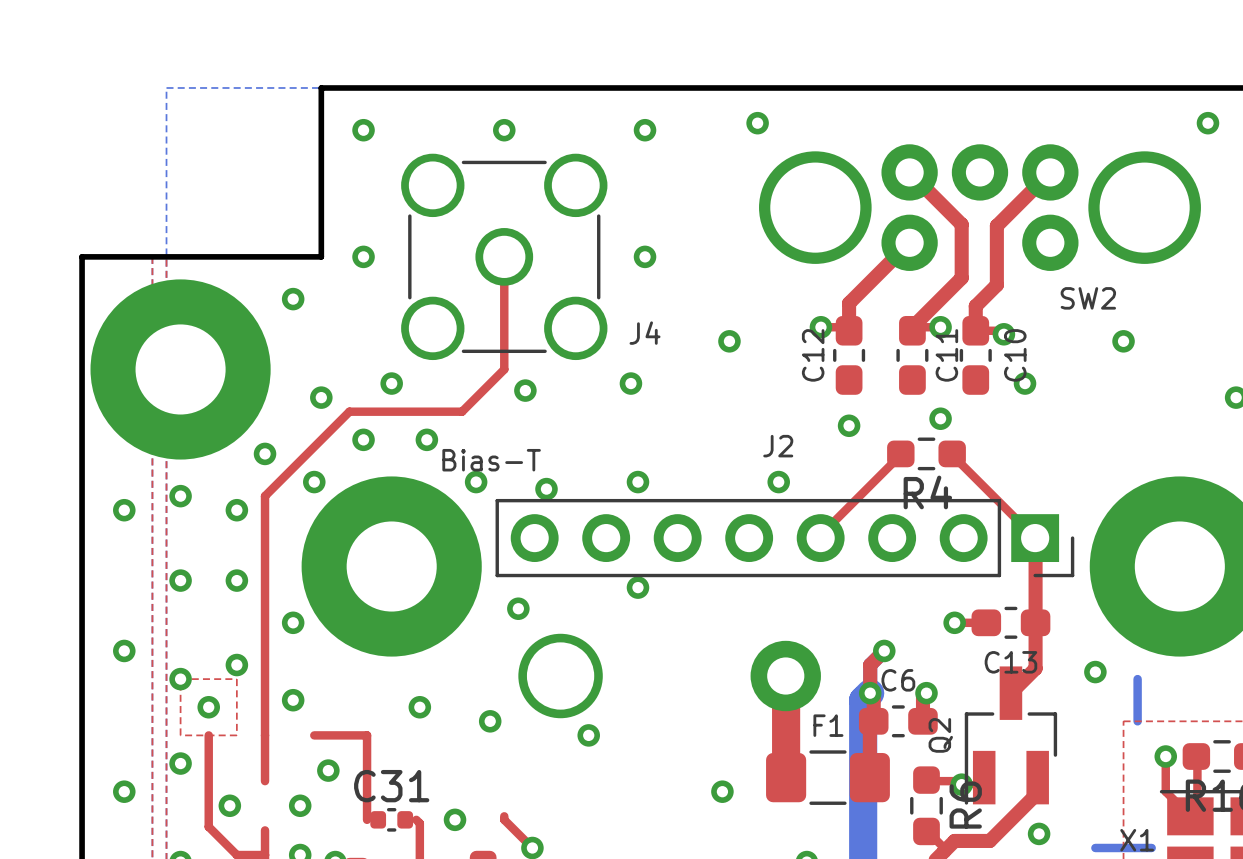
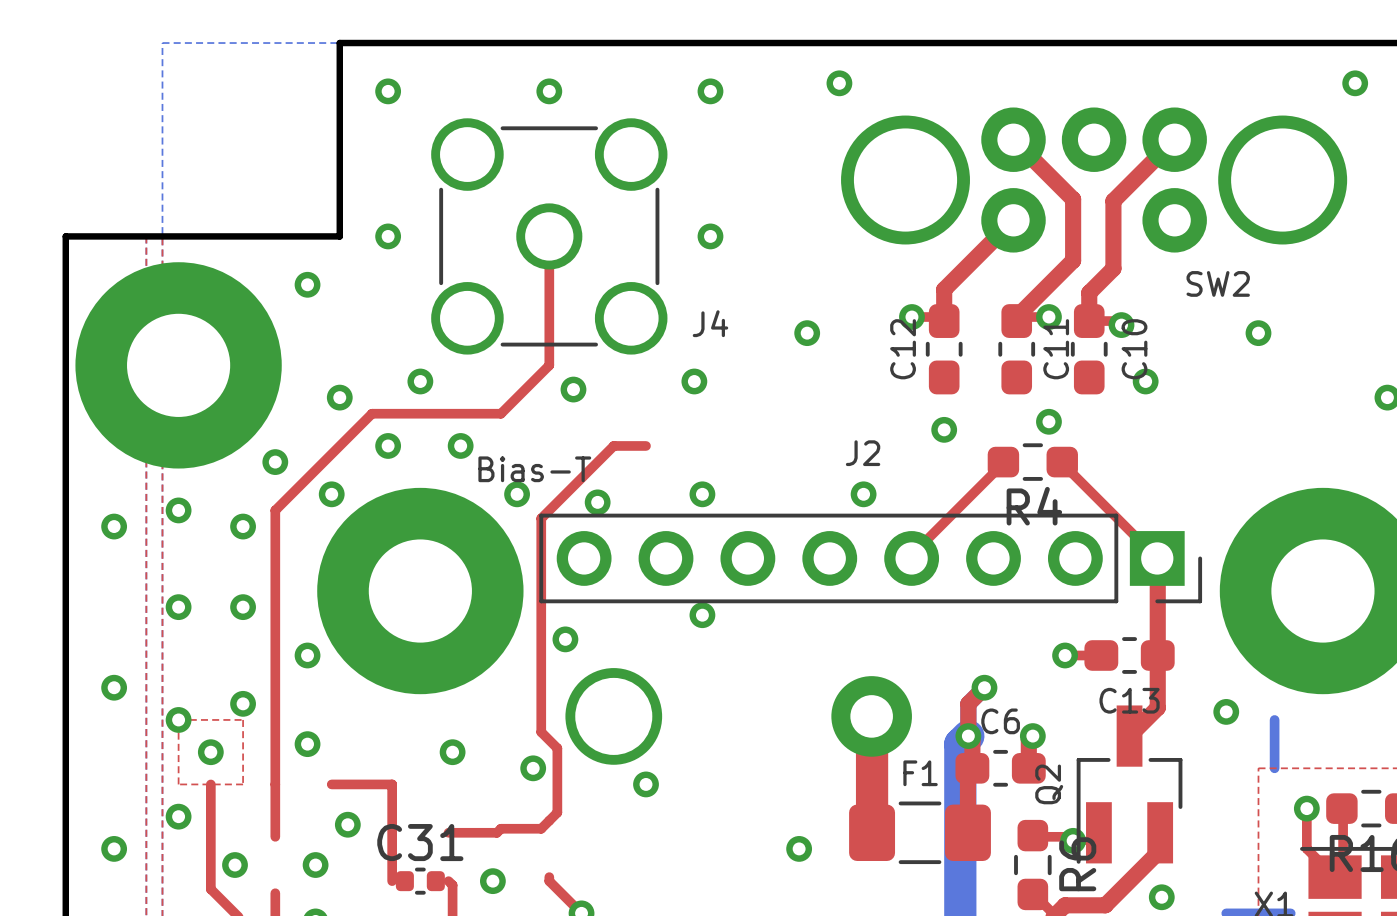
top track: none -> (646, 445) (613, 445) (541, 518) (541, 732) (557, 748) (557, 812) (541, 828) (500, 828) (496, 832) (448, 832)

